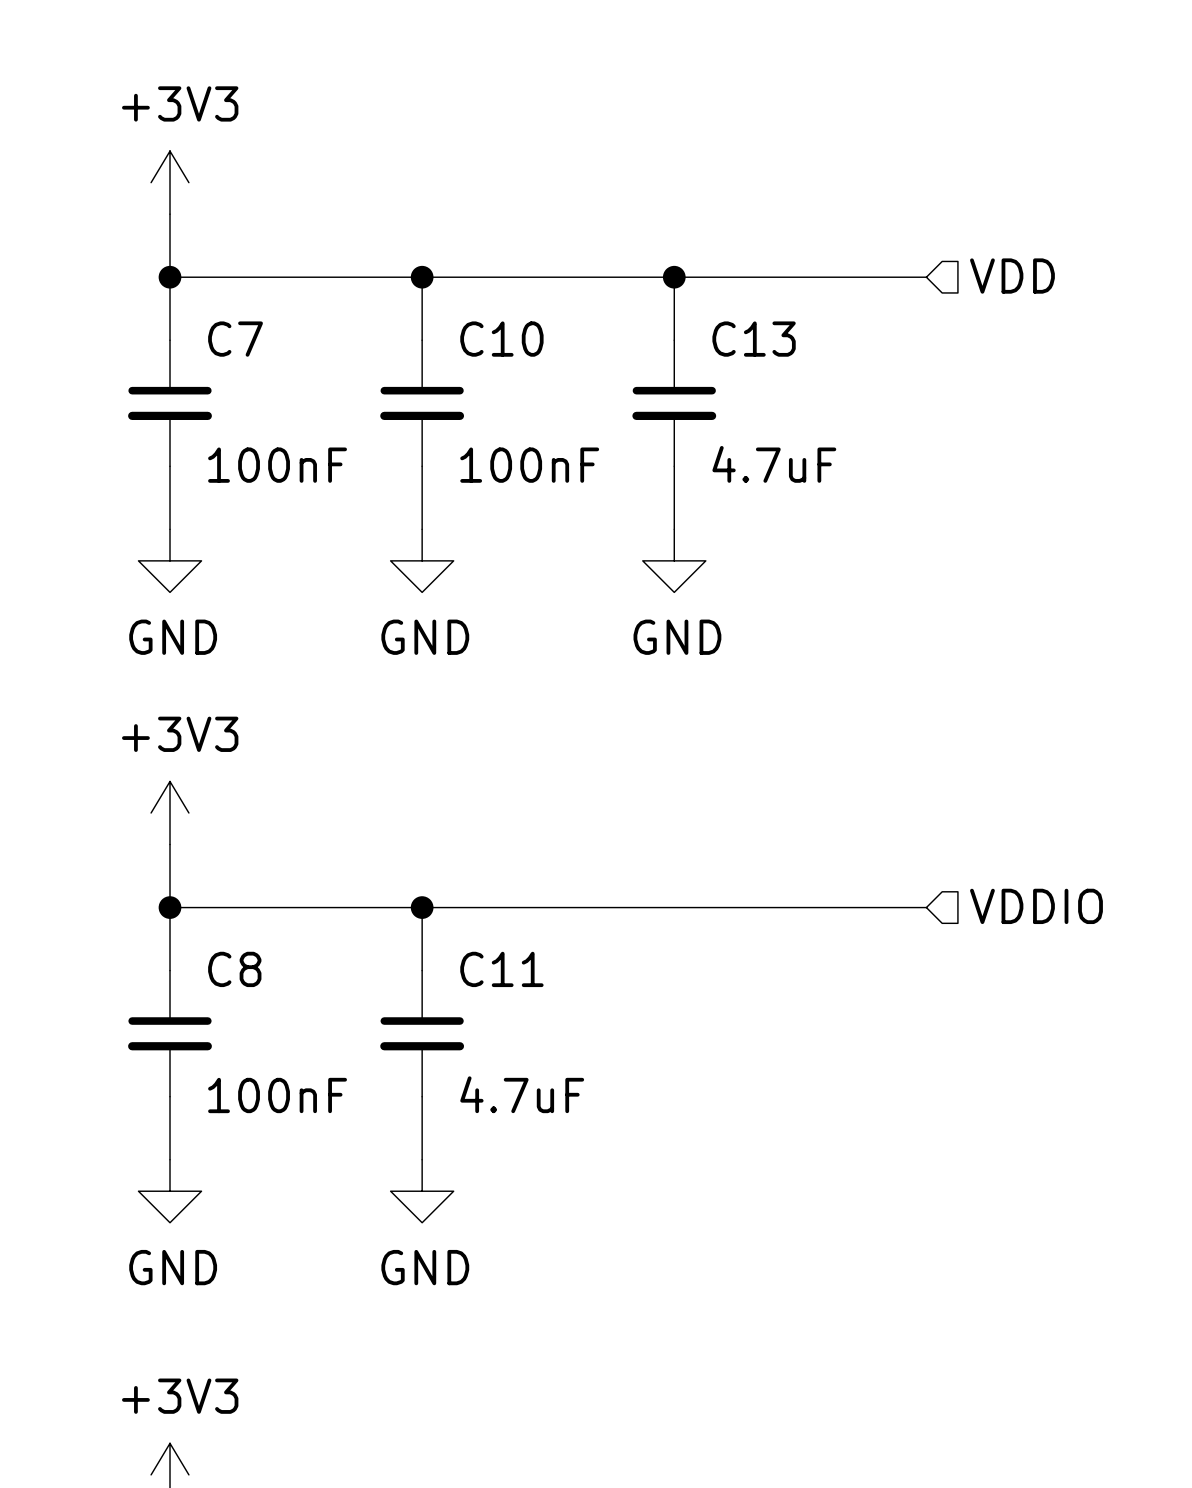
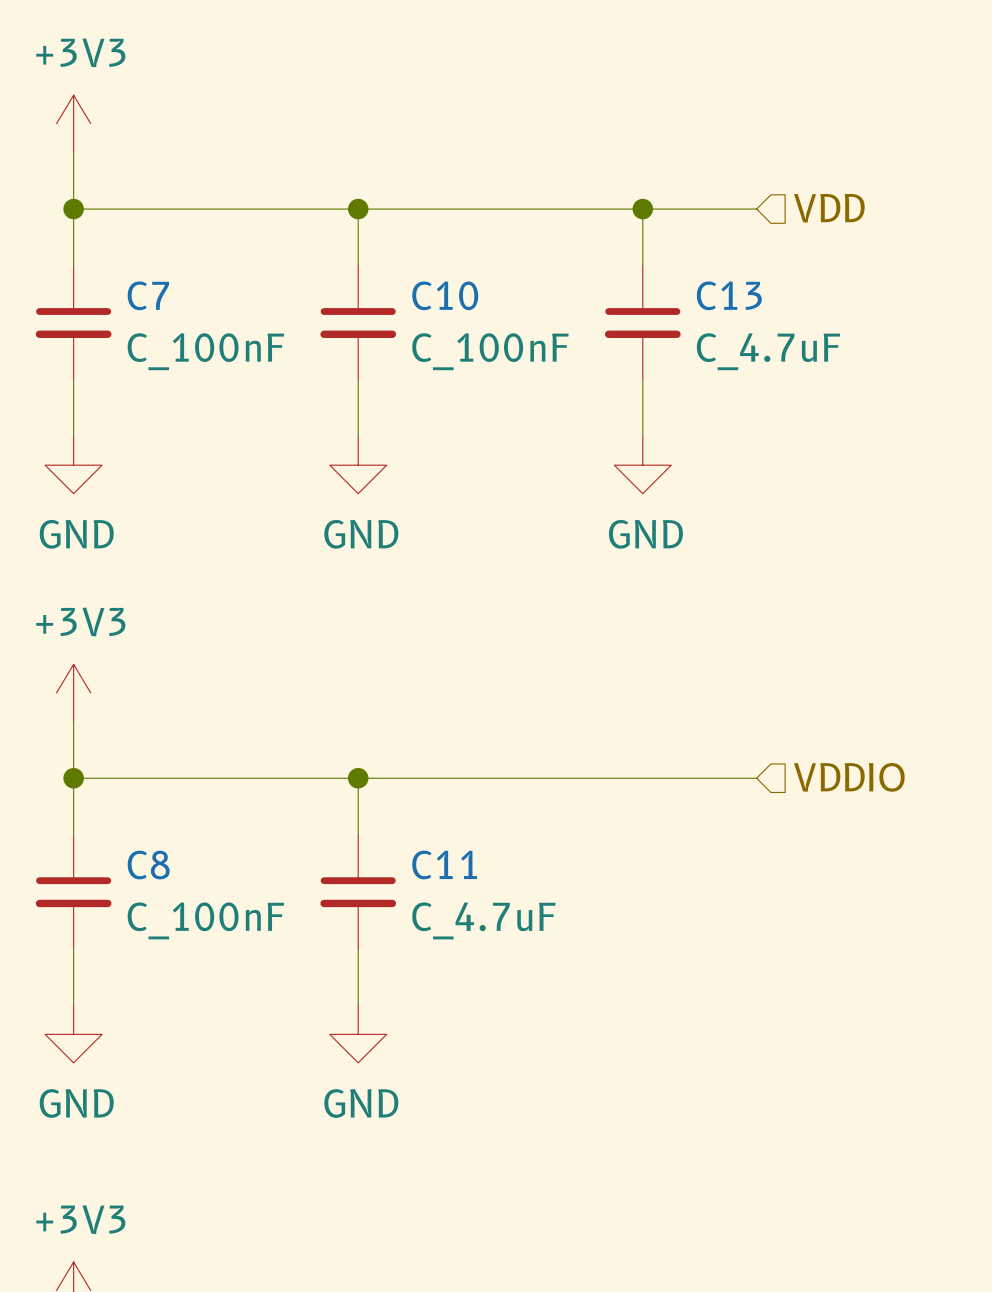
wire: (422, 277) (422, 340) -> (358, 209) (358, 265)
junction position: (422, 277) -> (358, 209)
wire: (674, 277) (674, 340) -> (642, 209) (642, 265)
junction: (674, 277) -> none
junction: none -> (642, 209)
C7 name position: C7 (235, 339) -> C7 (148, 295)
C10 name position: C10 (501, 339) -> C10 (445, 295)
C13 name position: C13 (754, 339) -> C13 (729, 295)
C10 position: (422, 403) -> (358, 322)
C13 position: (674, 403) -> (642, 322)
C13 value: 4.7uF (774, 464) -> C_4.7uF (768, 351)
C7 value: 100nF (277, 465) -> C_100nF (205, 351)
C10 value: 100nF (529, 465) -> C_100nF (490, 351)
wire: (422, 466) (422, 529) -> (358, 379) (358, 436)
wire: (674, 466) (674, 529) -> (642, 379) (642, 436)
power symbol position: GND (422, 560) -> GND (358, 465)
power symbol: GND (674, 560) -> none
power symbol: none -> GND (642, 465)
wire: (422, 907) (422, 970) -> (358, 778) (358, 835)
junction position: (422, 907) -> (358, 778)
C8 name position: C8 (234, 969) -> C8 (148, 865)
C11 name position: C11 (501, 969) -> C11 (444, 864)
C11 position: (422, 1033) -> (358, 892)
C11 value: 4.7uF (522, 1094) -> C_4.7uF (483, 920)
C8 value: 100nF (277, 1095) -> C_100nF (205, 920)
wire: (422, 1096) (422, 1159) -> (358, 948) (358, 1005)
power symbol position: GND (422, 1191) -> GND (358, 1034)

